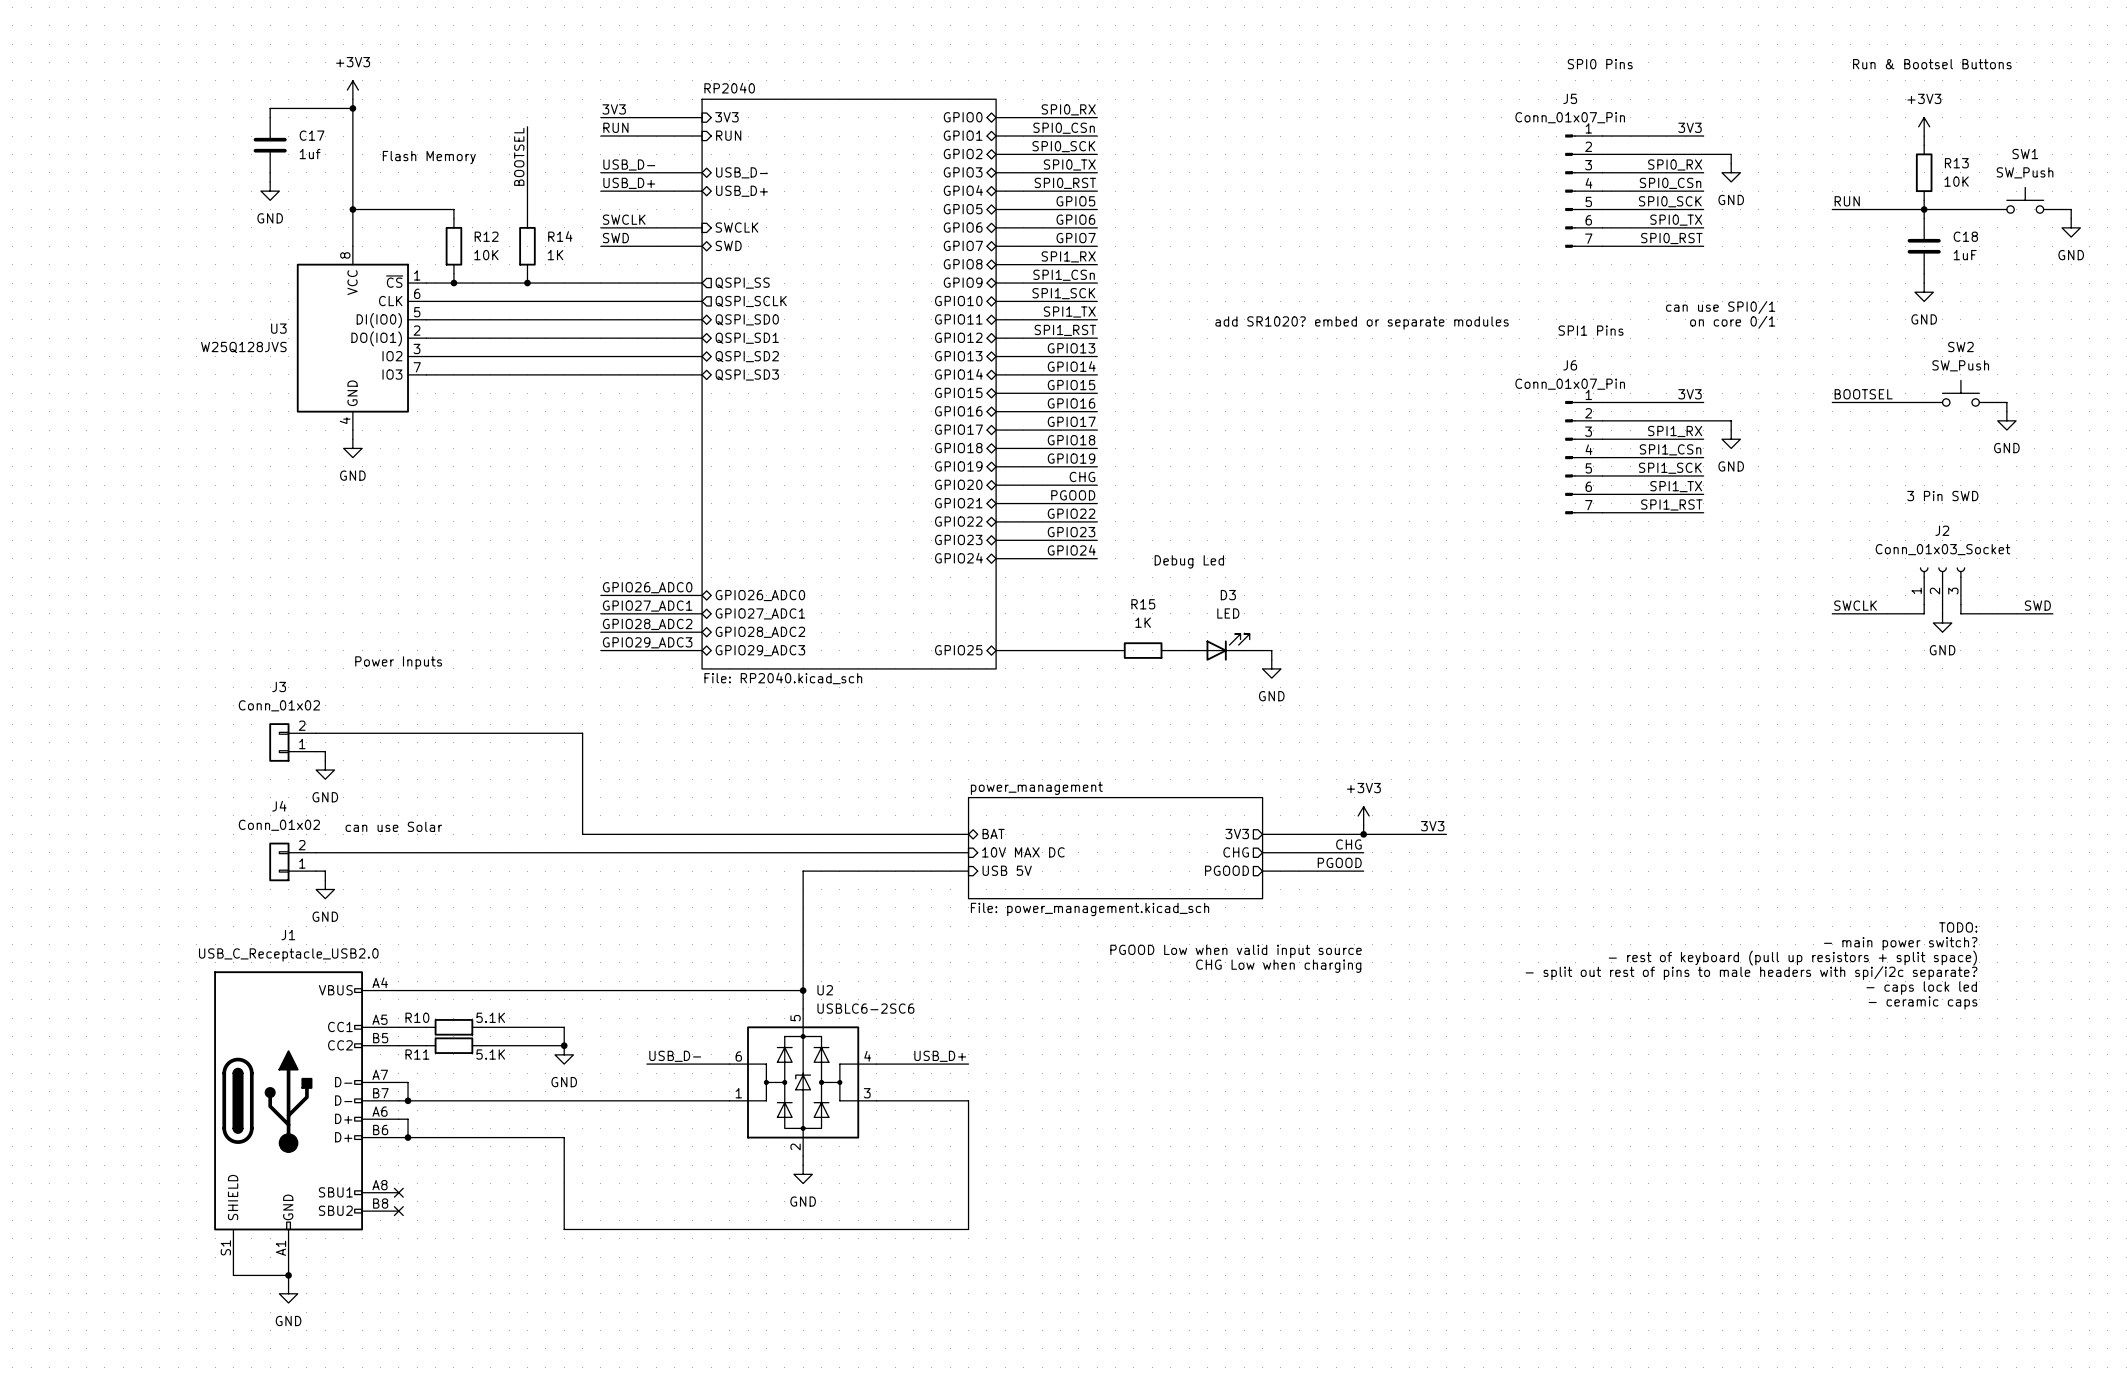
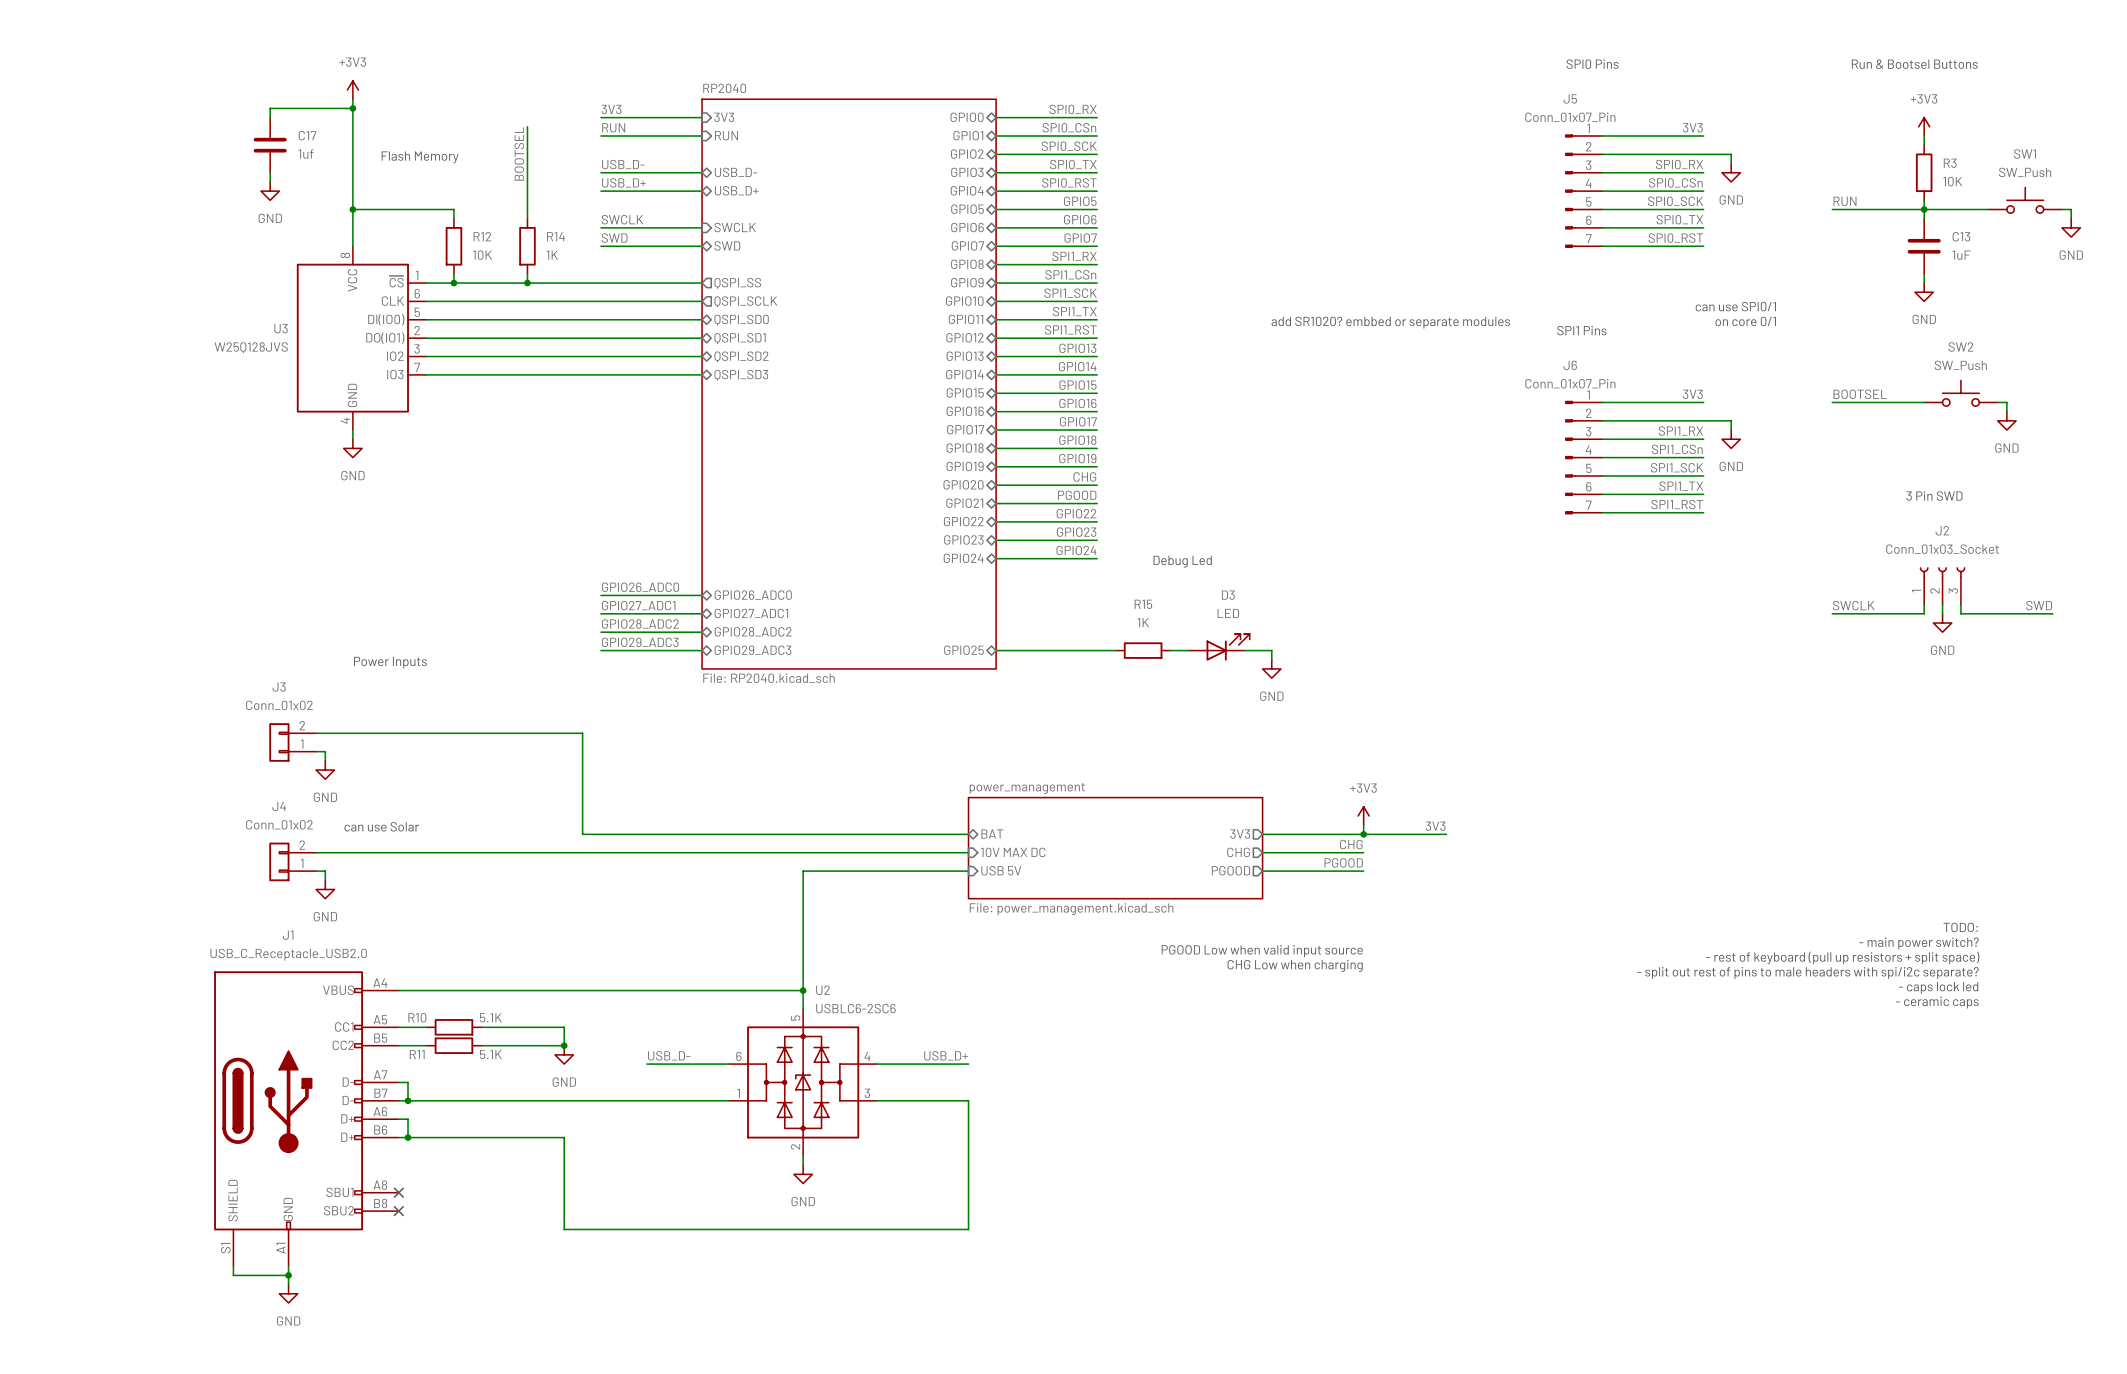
R13 name: R13 (1956, 163) -> R3 (1950, 163)
C18 name: C18 (1965, 236) -> C13 (1961, 236)
text: add SR1020? embed or separate modules (1362, 322) -> add SR1020? embbed or separate modules (1390, 322)

